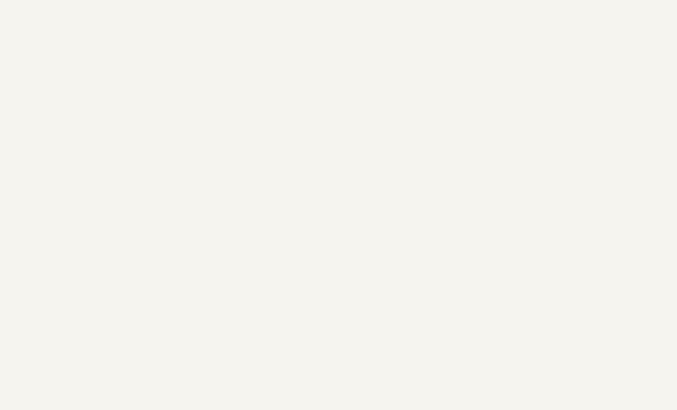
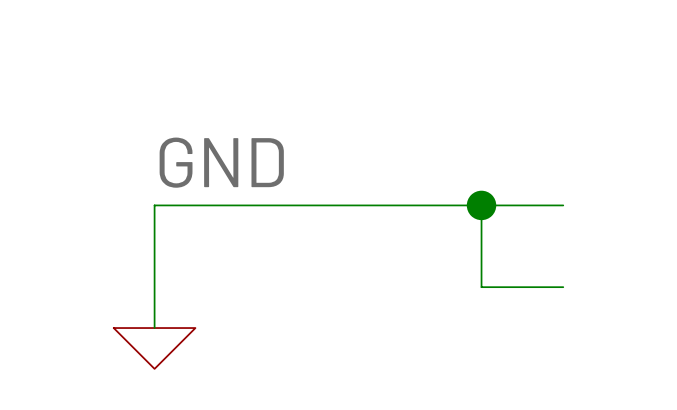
label: none -> GND (221, 162)
wire: none -> (481, 205) (481, 287) (563, 287)
junction: none -> (481, 205)
wire: none -> (563, 205) (154, 205) (154, 328)
power symbol: none -> (154, 348)

